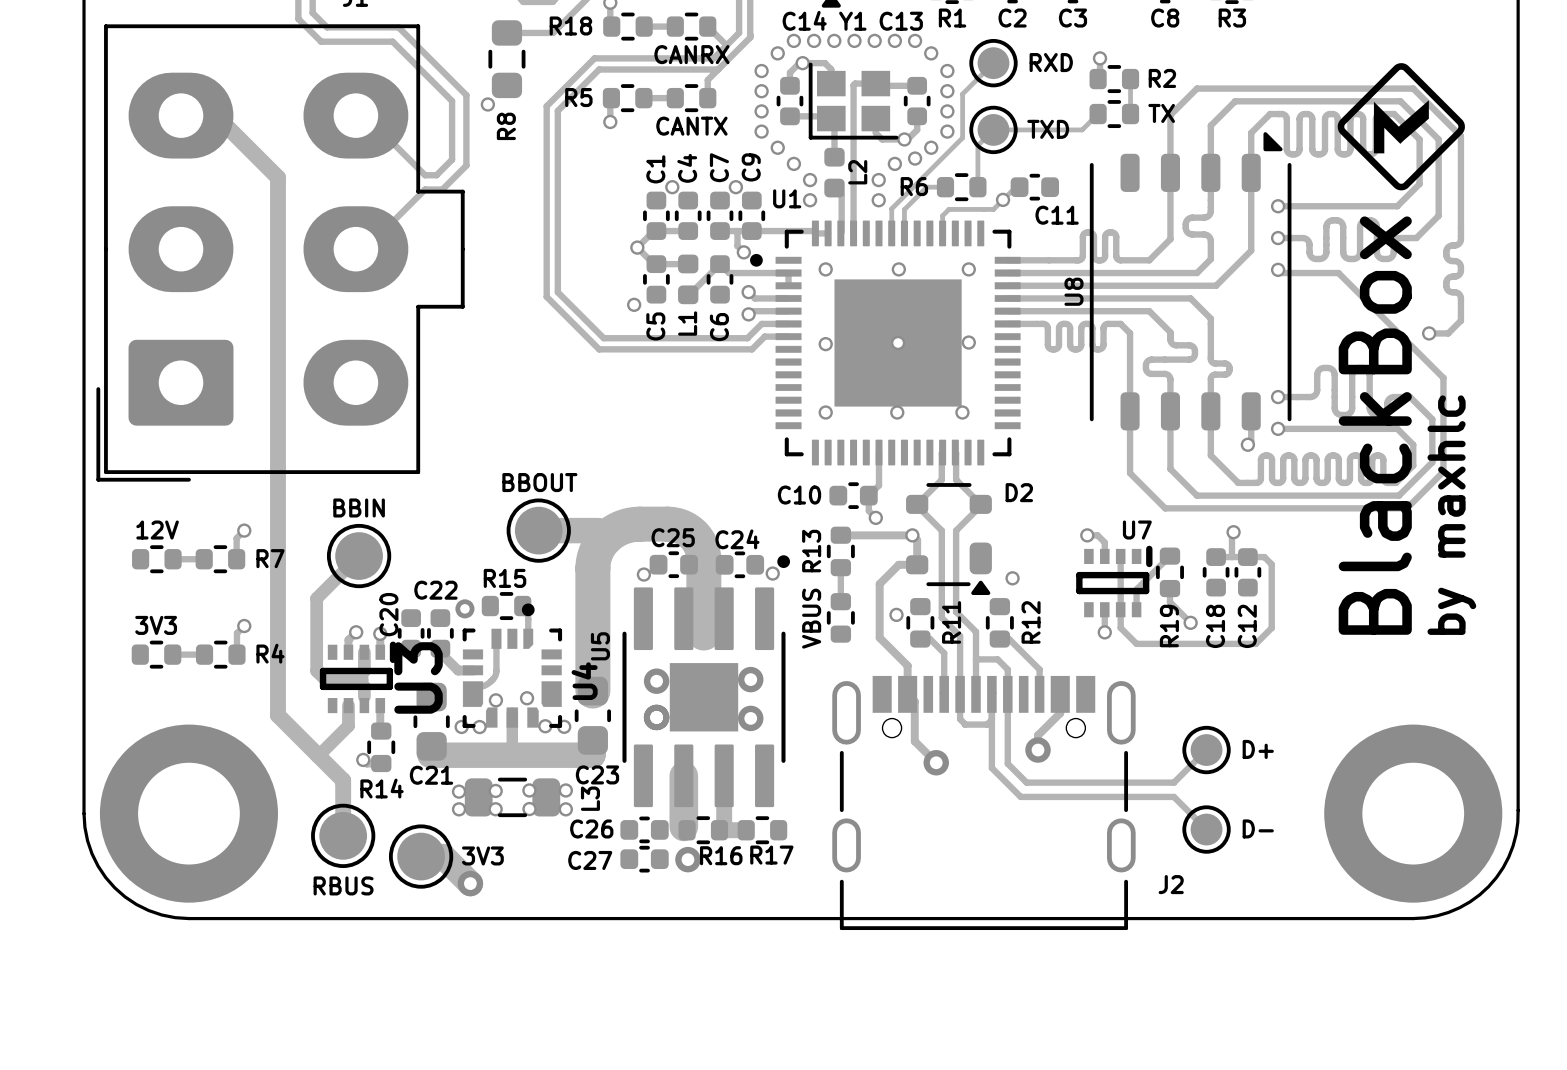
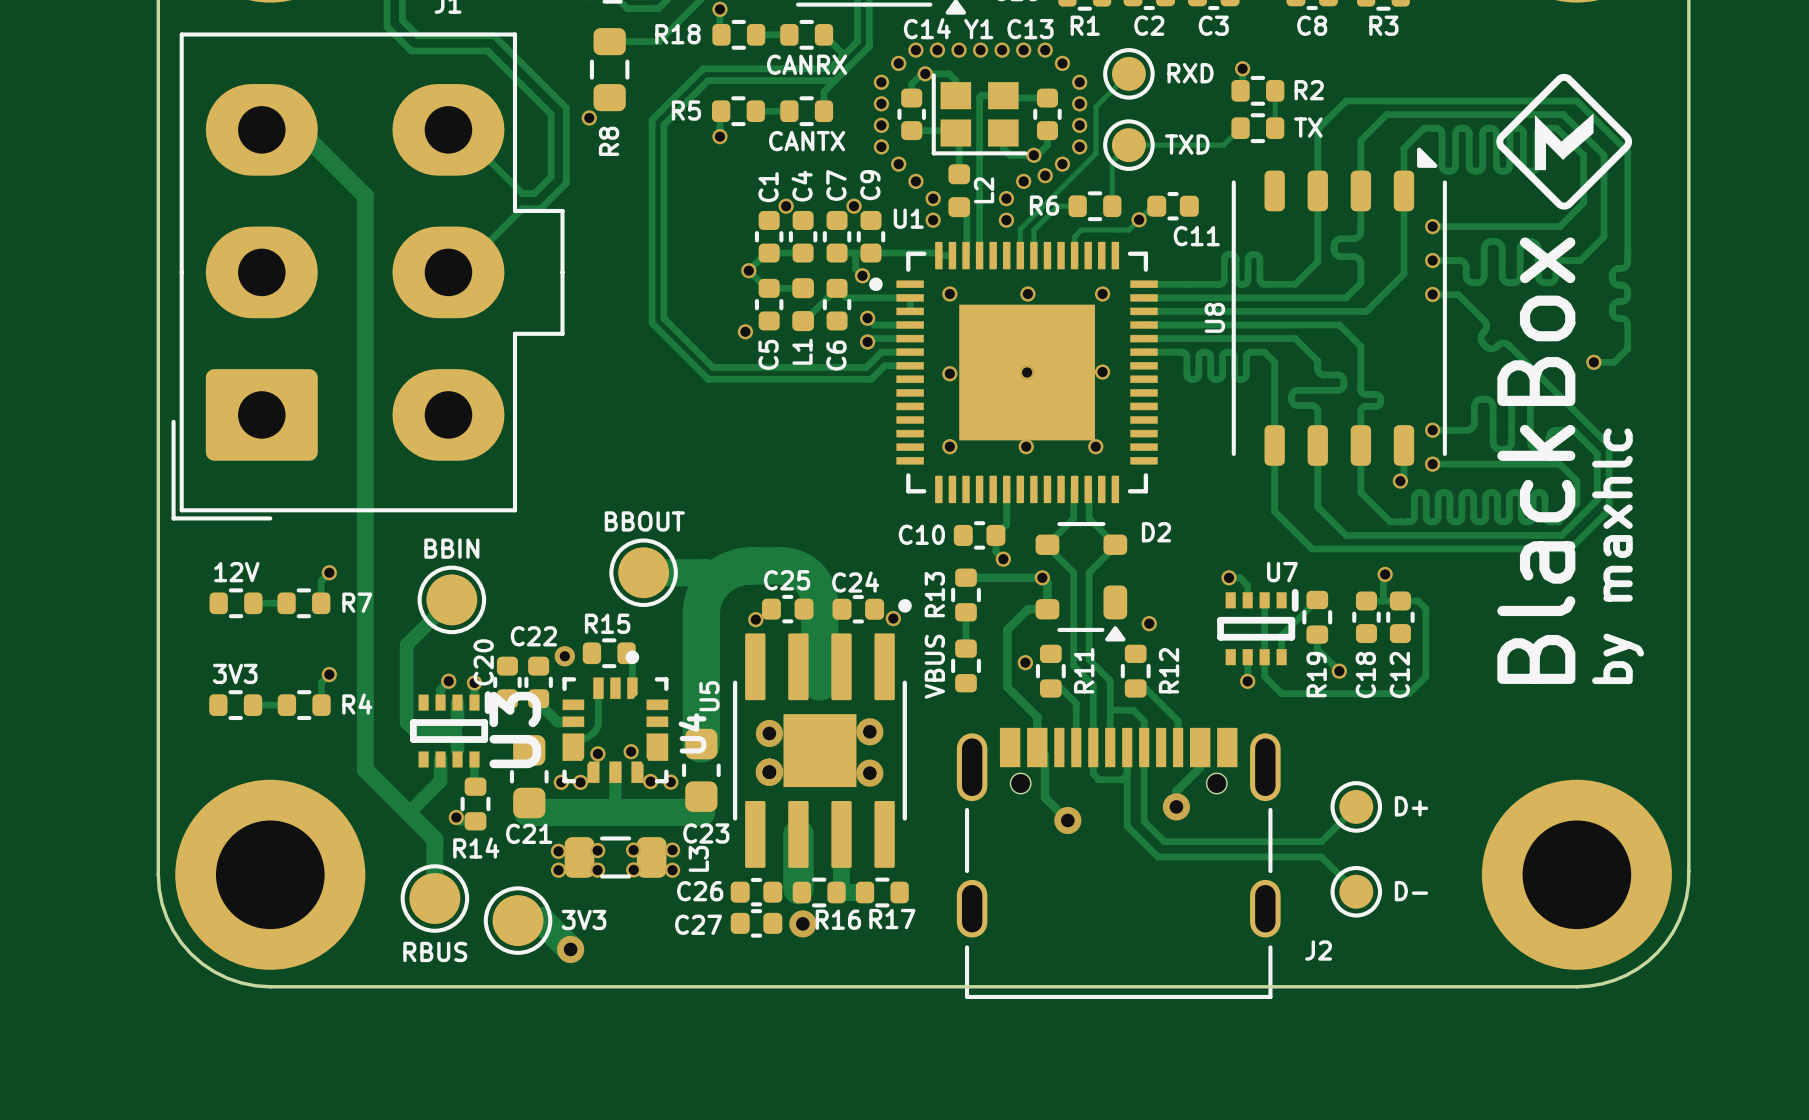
track: (1278, 270) (1281, 273) (1338, 273) (1443, 377) (1443, 411) -> (1432, 294) (1458, 294) (1485, 322) (1486, 328) (1480, 337) (1483, 343) (1491, 348) (1501, 343) (1508, 344) (1609, 445)

